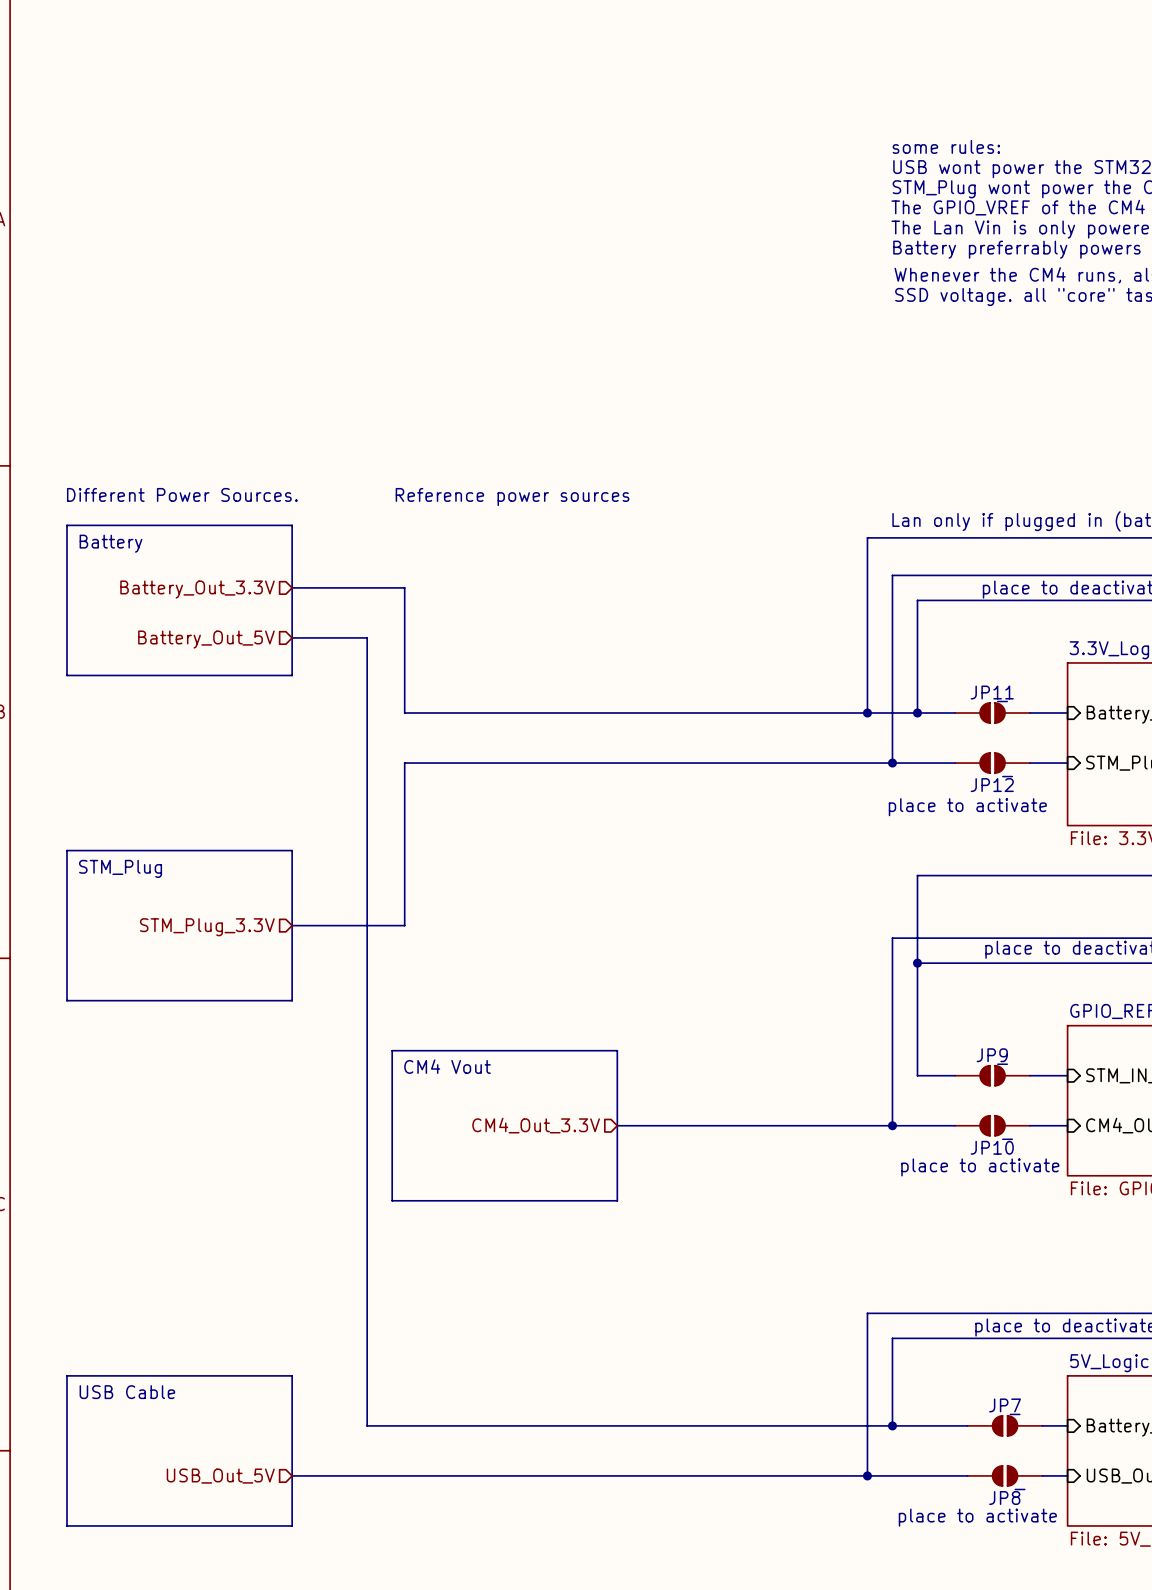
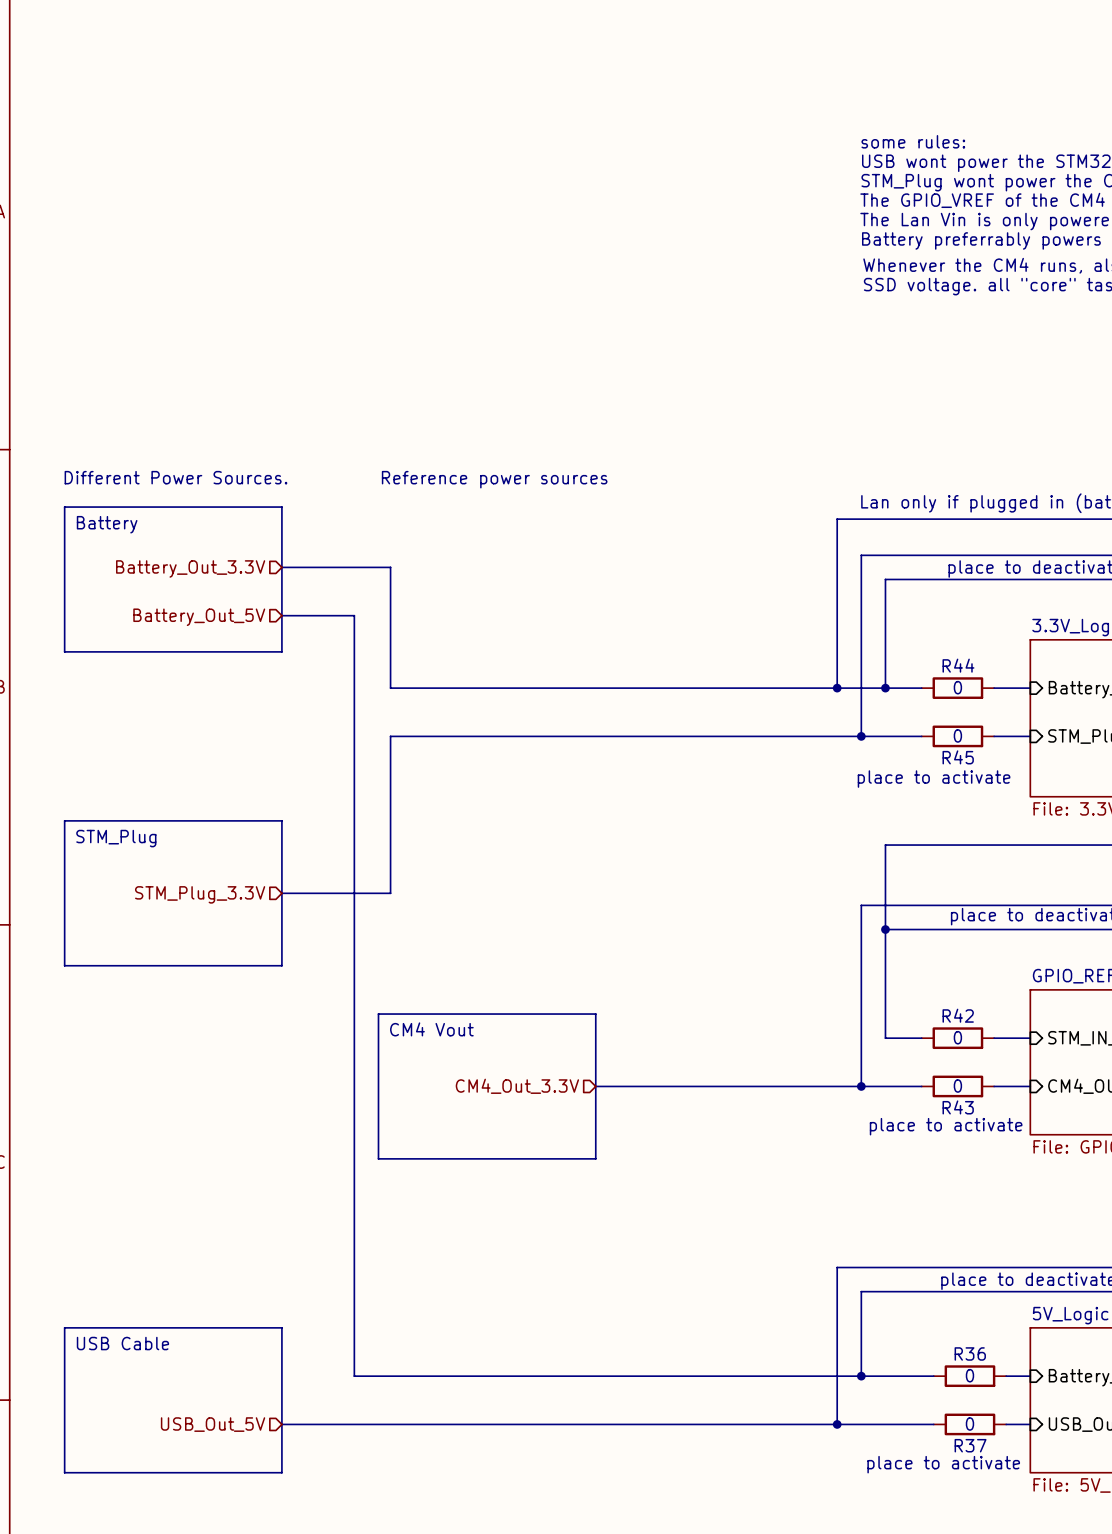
JP11: - (992, 713) -> none
R44: none -> 0 (957, 688)
JP12: - (992, 763) -> none
R45: none -> 0 (957, 736)
JP9: - (992, 1075) -> none
R42: none -> 0 (957, 1038)
JP10: - (992, 1125) -> none
R43: none -> 0 (957, 1086)
JP7: - (1005, 1425) -> none
R36: none -> 0 (969, 1376)
JP8: - (1005, 1475) -> none
R37: none -> 0 (969, 1424)

